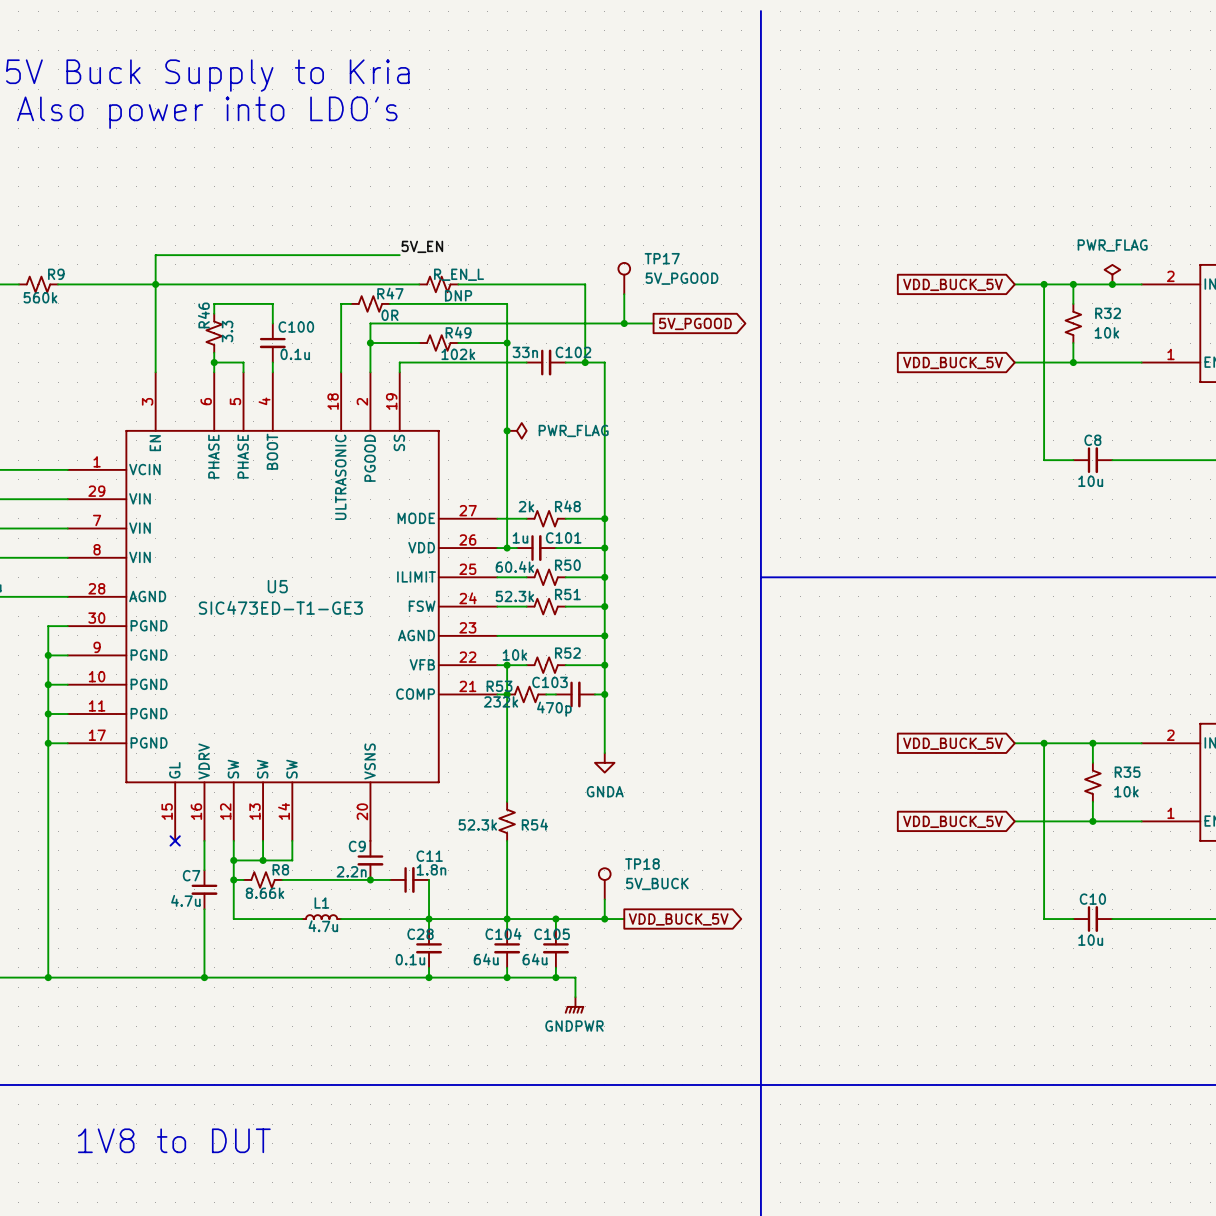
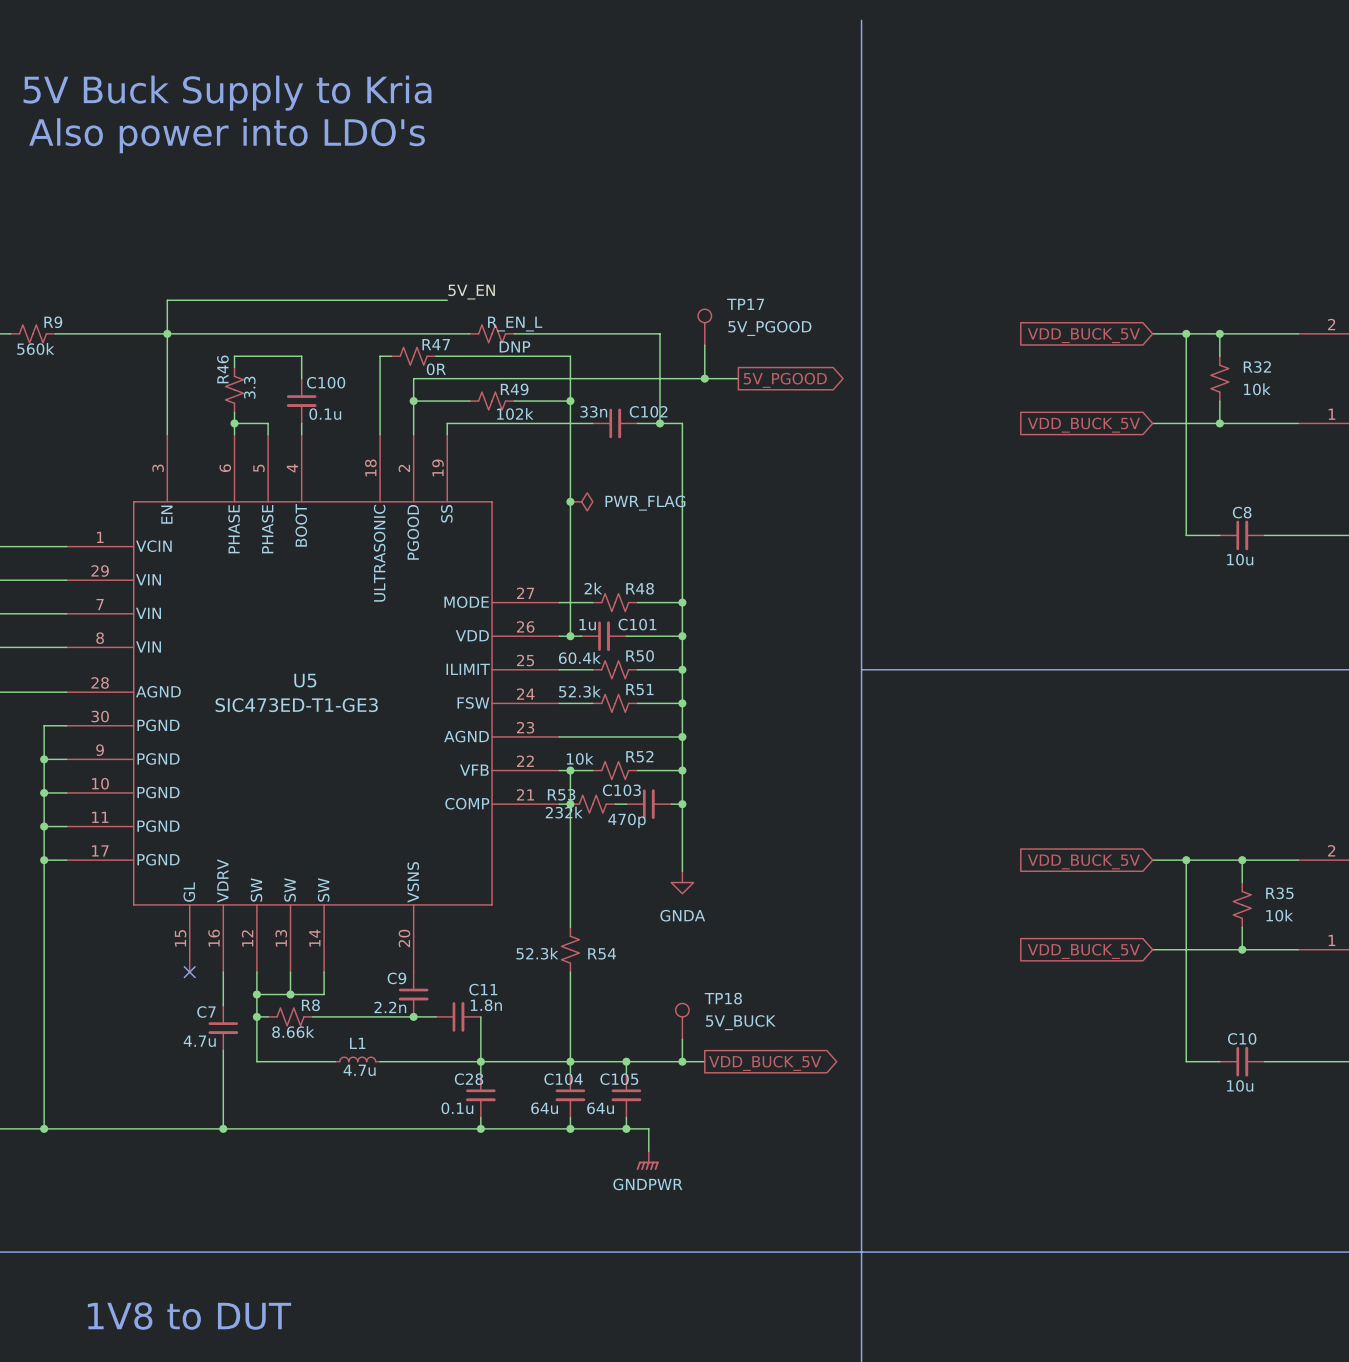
power symbol: PWR_FLAG (1112, 274) -> none
junction: (1112, 284) -> none

